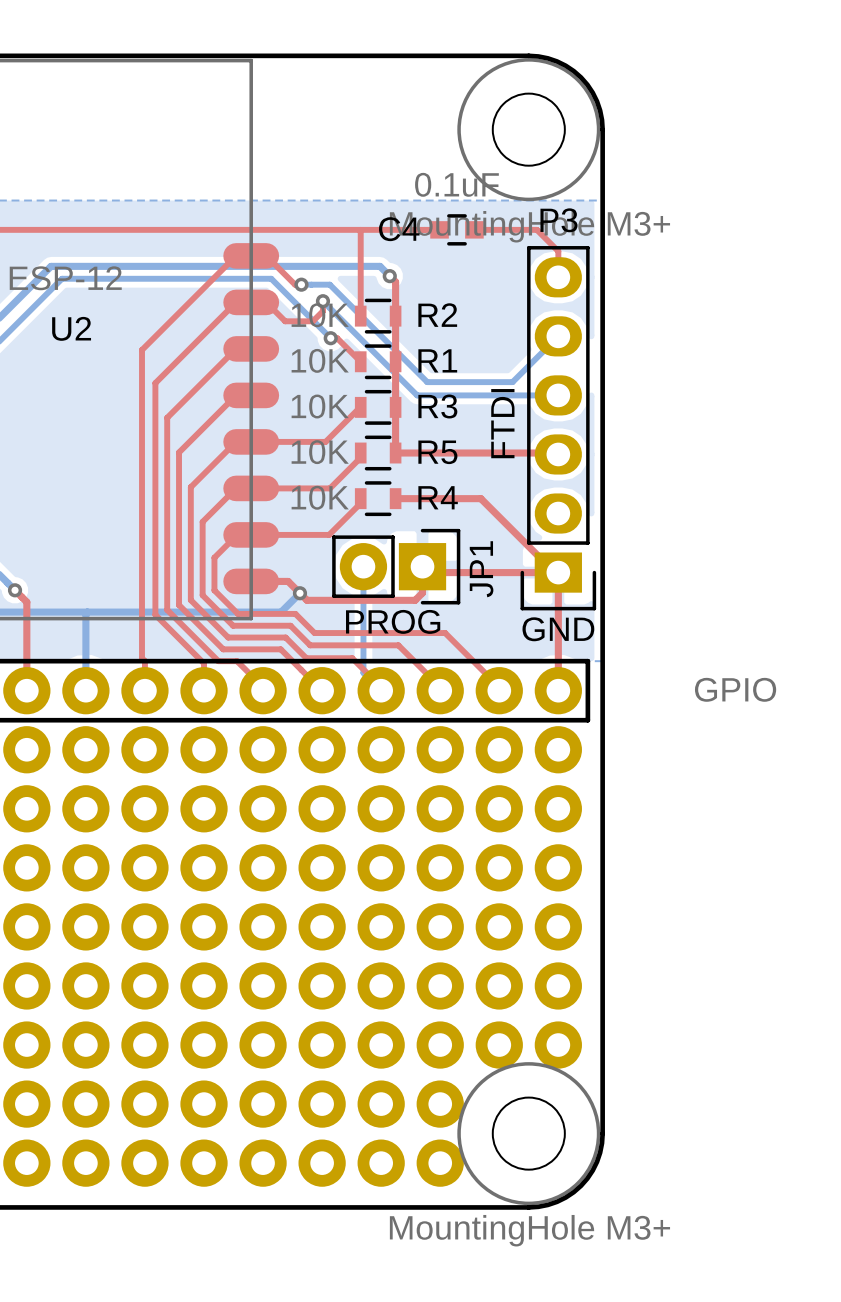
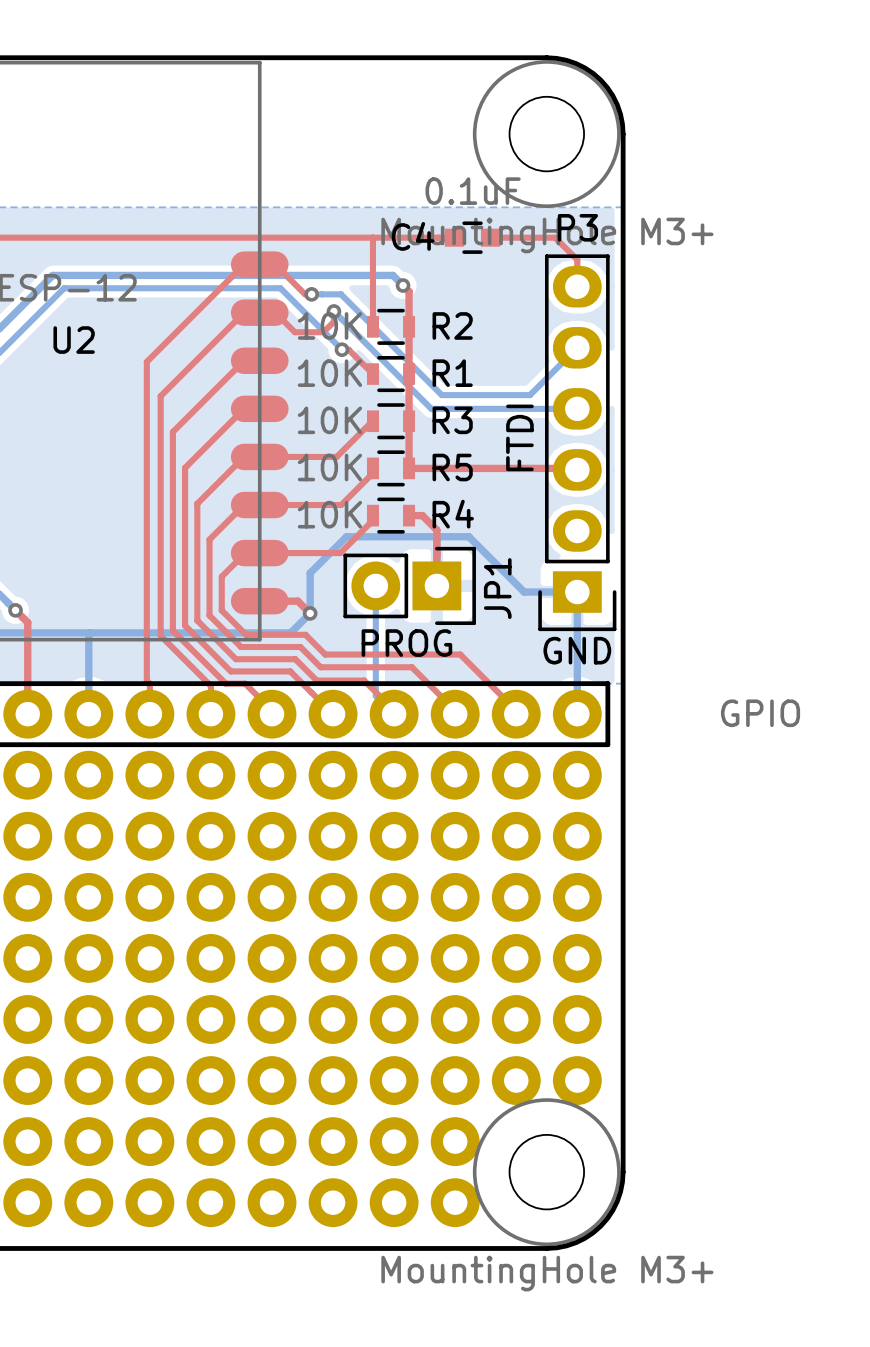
top track: (408, 498) (480, 498) (554, 572) (432, 572) -> (422, 515) (436, 530) (436, 581)
top track: (422, 566) (422, 592) (415, 600) (307, 600) (299, 593) -> none
top track: (558, 572) (558, 687) -> none
bottom track: none -> (310, 613) (310, 573) (346, 536) (468, 536) (524, 592) (577, 592) (577, 714)

